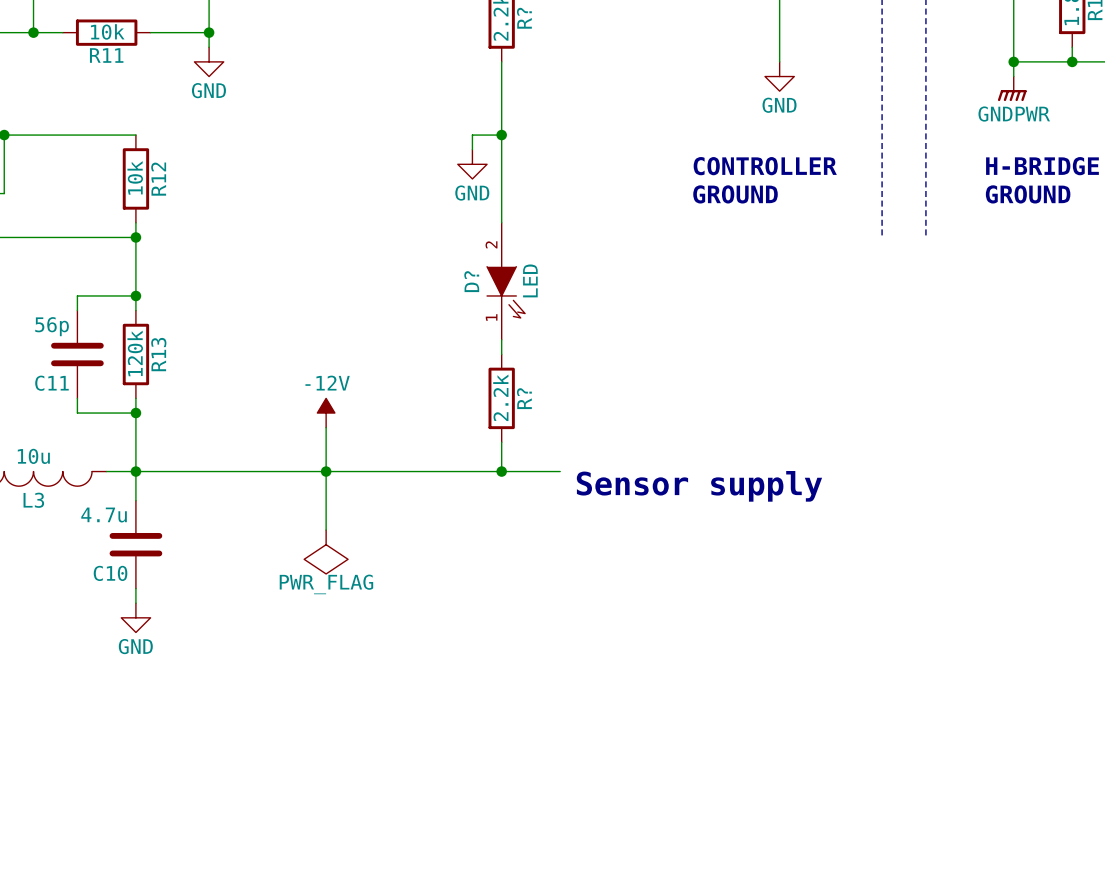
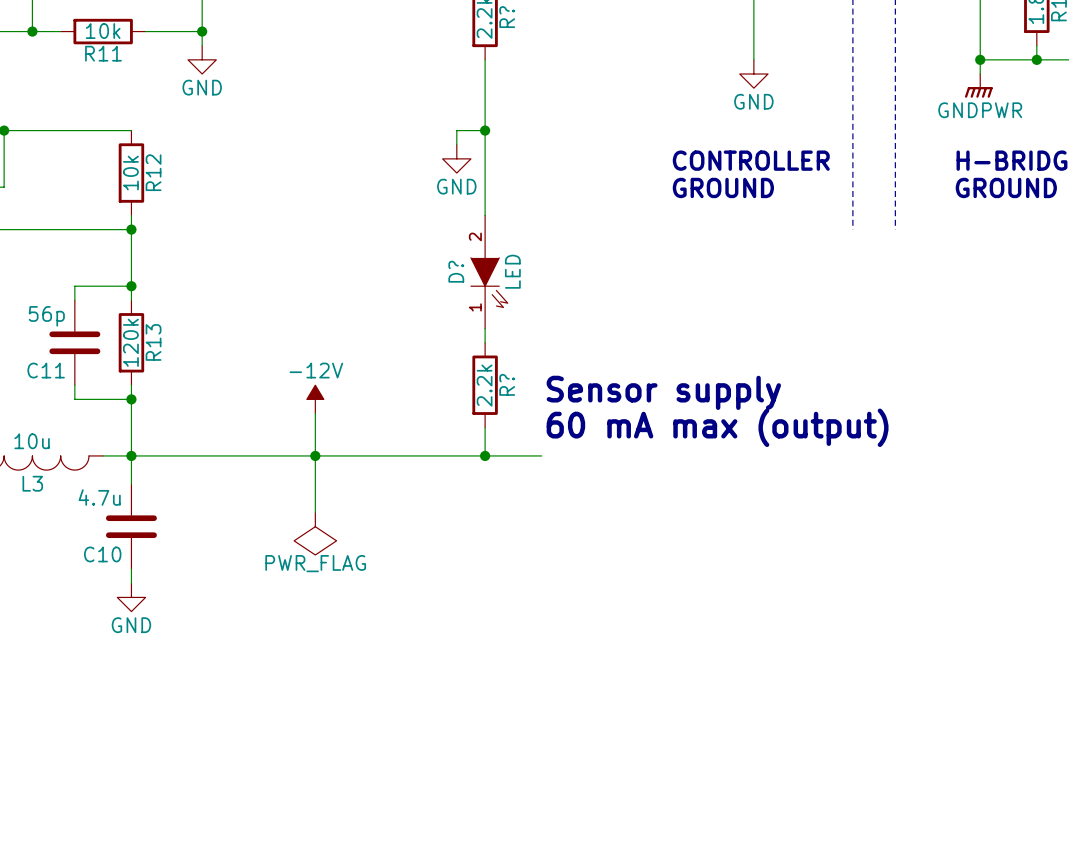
text: none -> 60 mA max (output) (717, 427)
text position: Sensor supply (699, 486) -> Sensor supply (663, 392)

